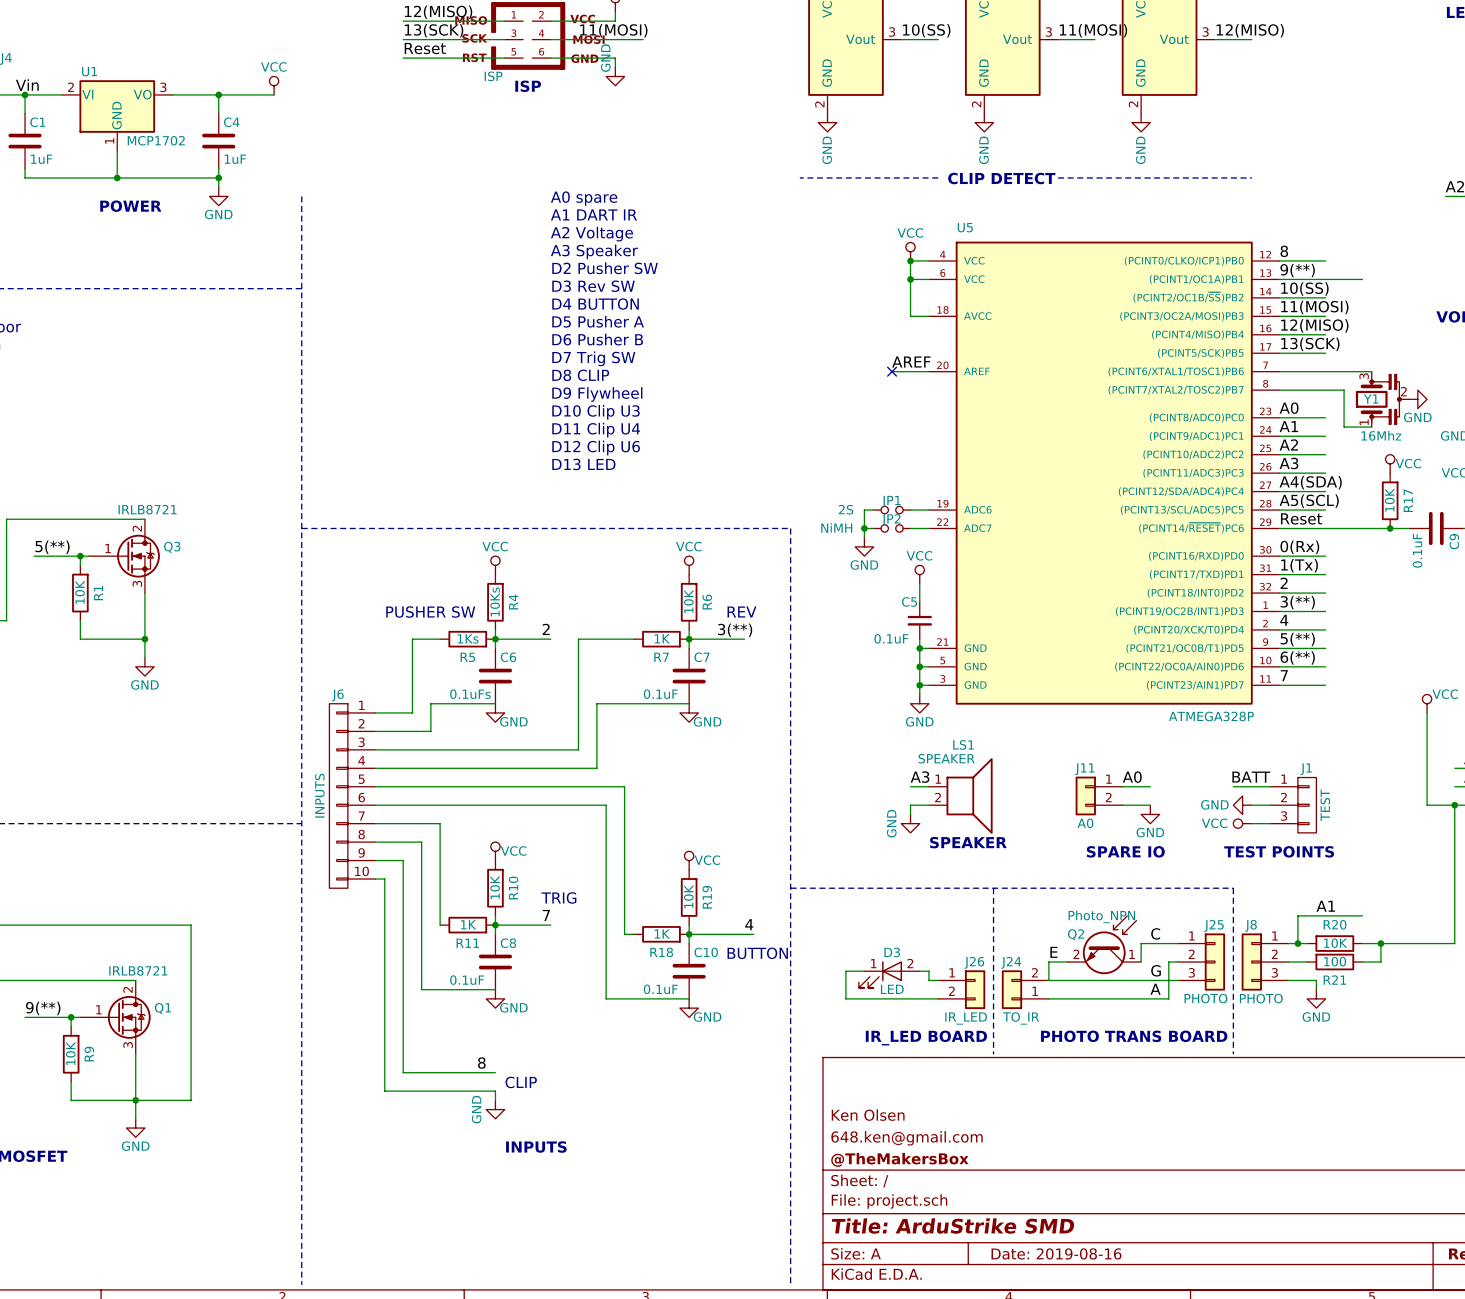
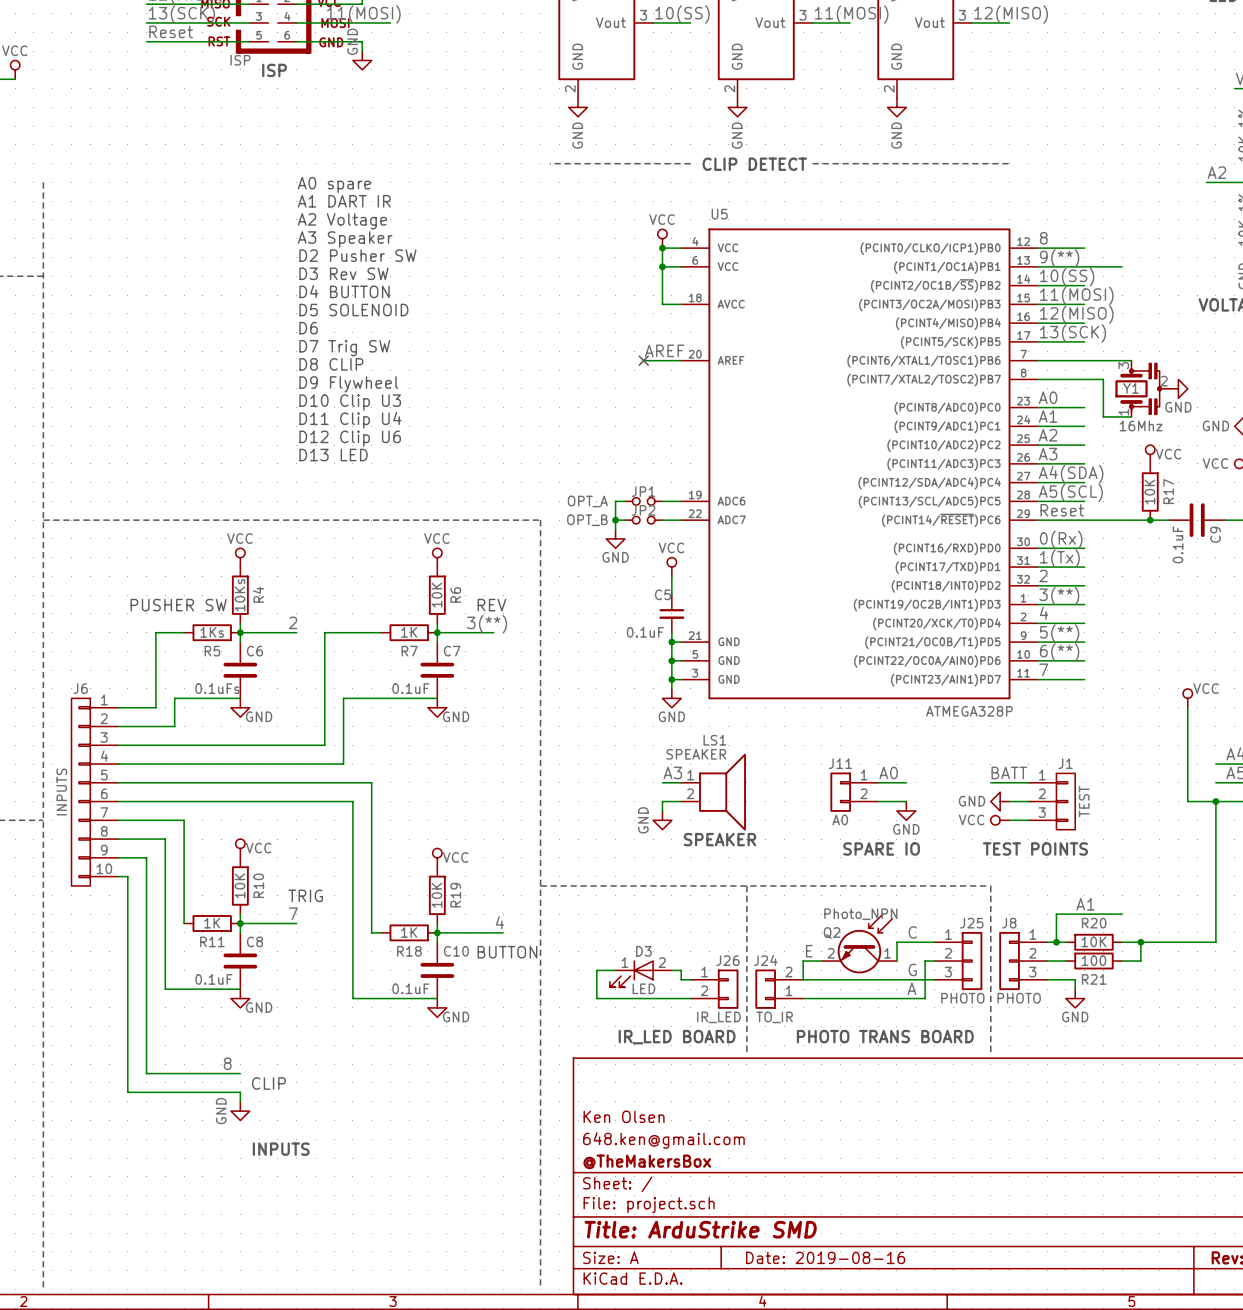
text: D5 Pusher A (598, 321) -> D5 SOLENOID (353, 310)
text: D6 Pusher B (597, 339) -> D6 (308, 328)
JP1 value: 2S (846, 509) -> OPT_A (587, 501)
JP2 value: NiMH (836, 527) -> OPT_B (587, 520)

